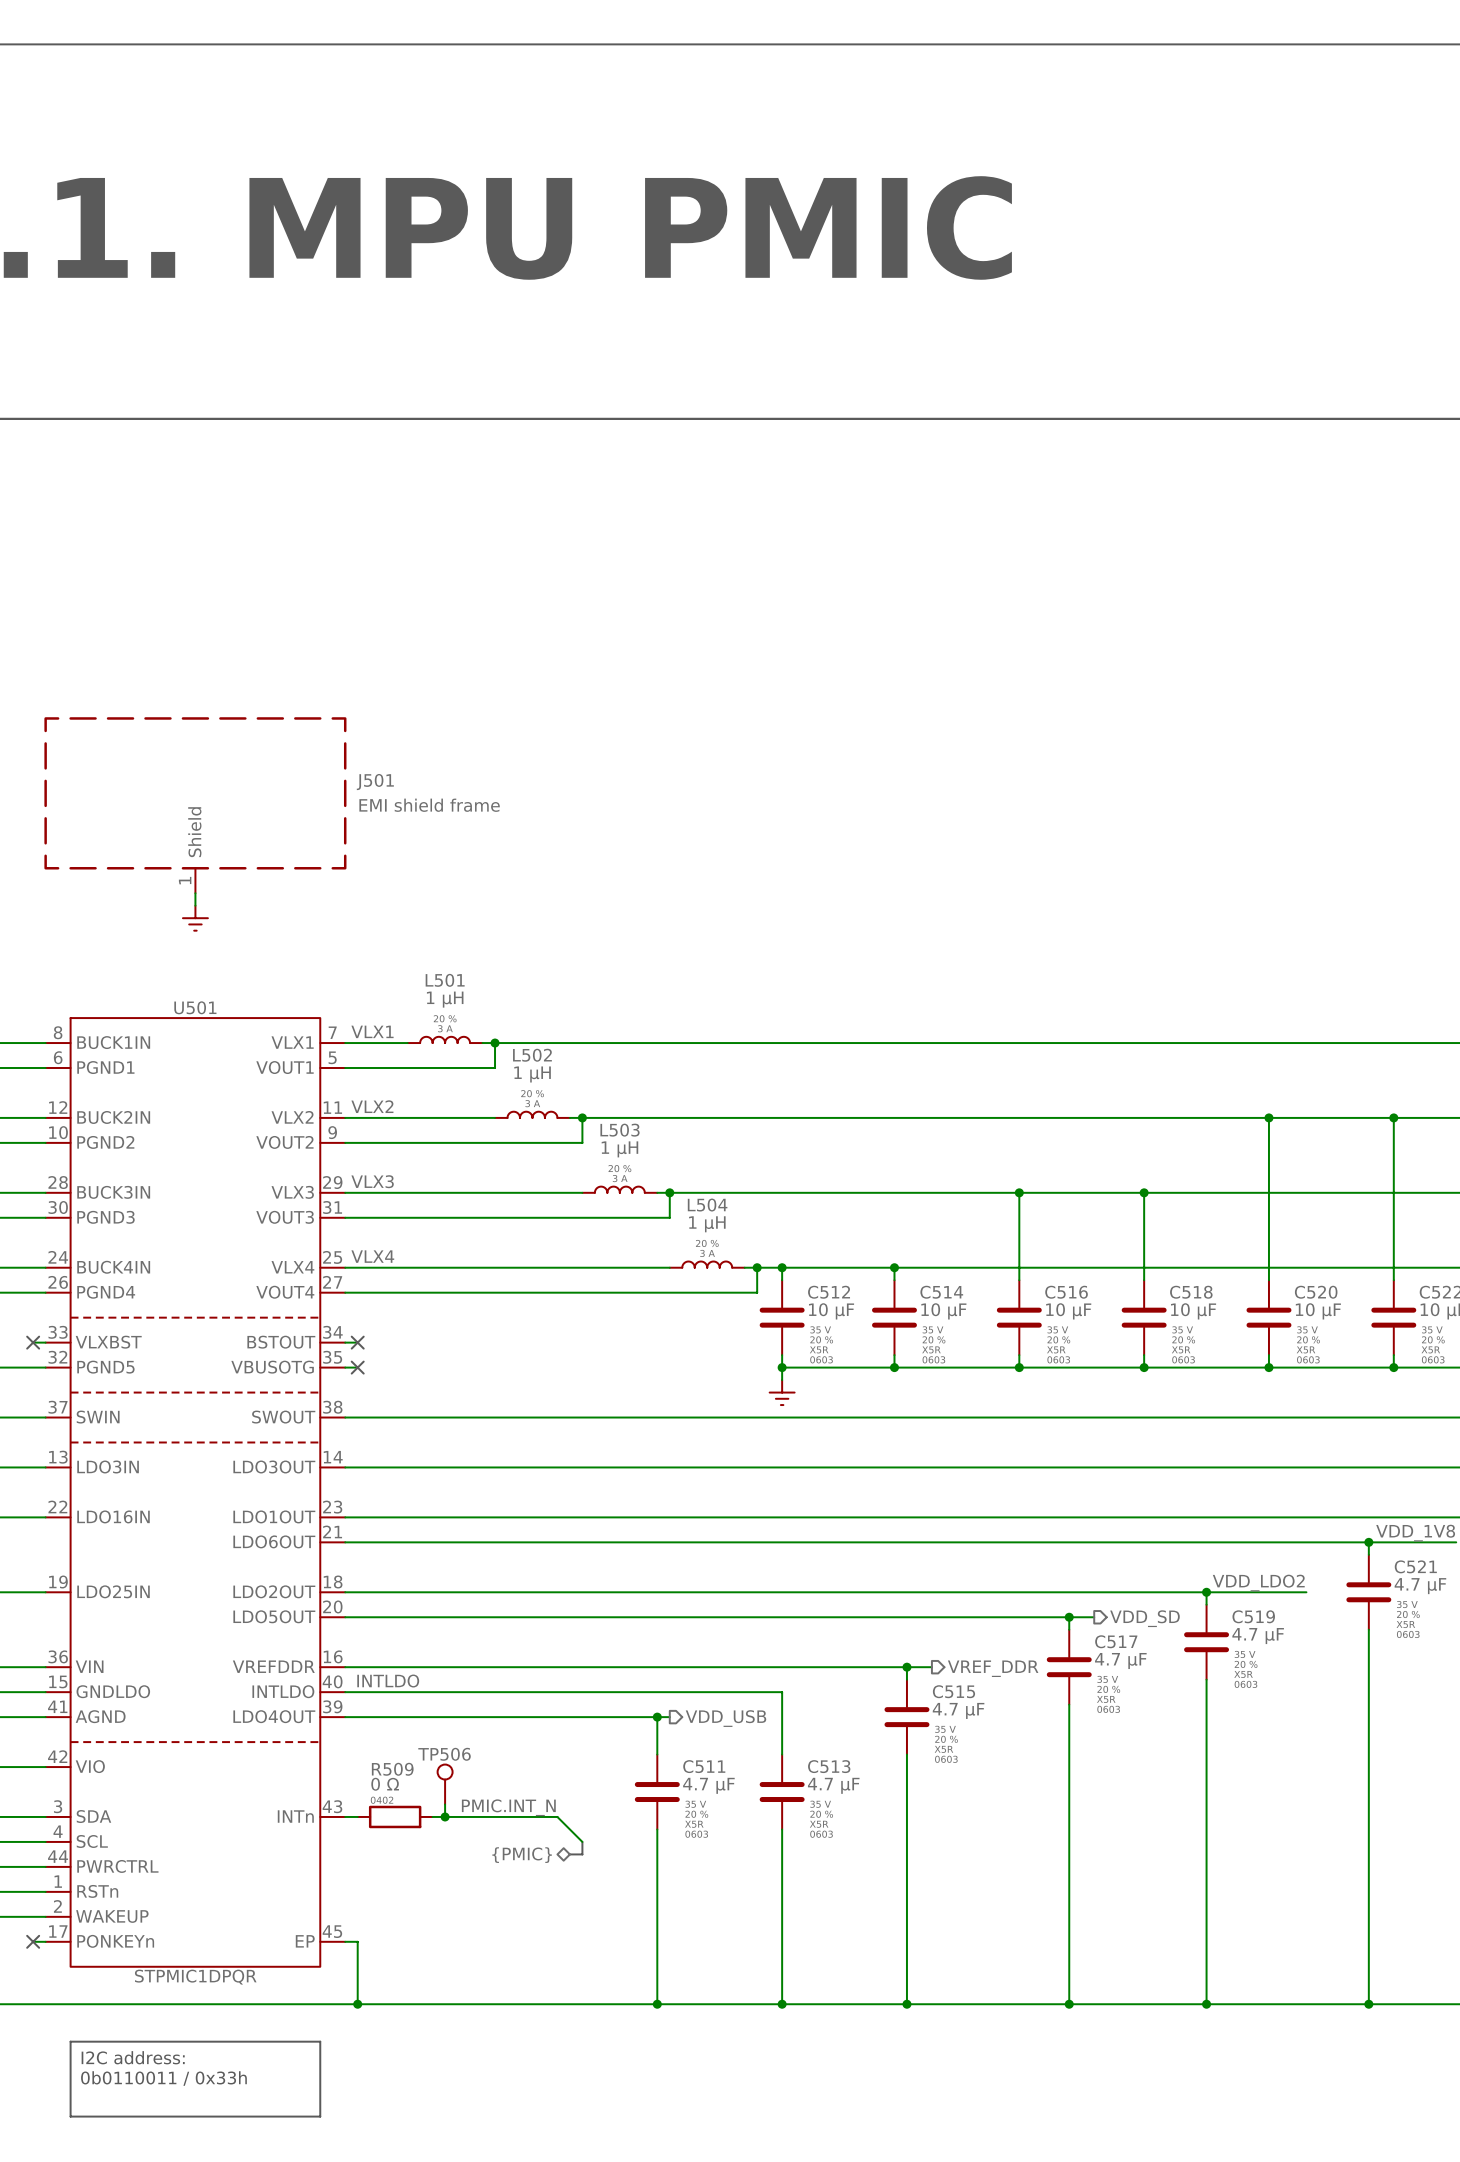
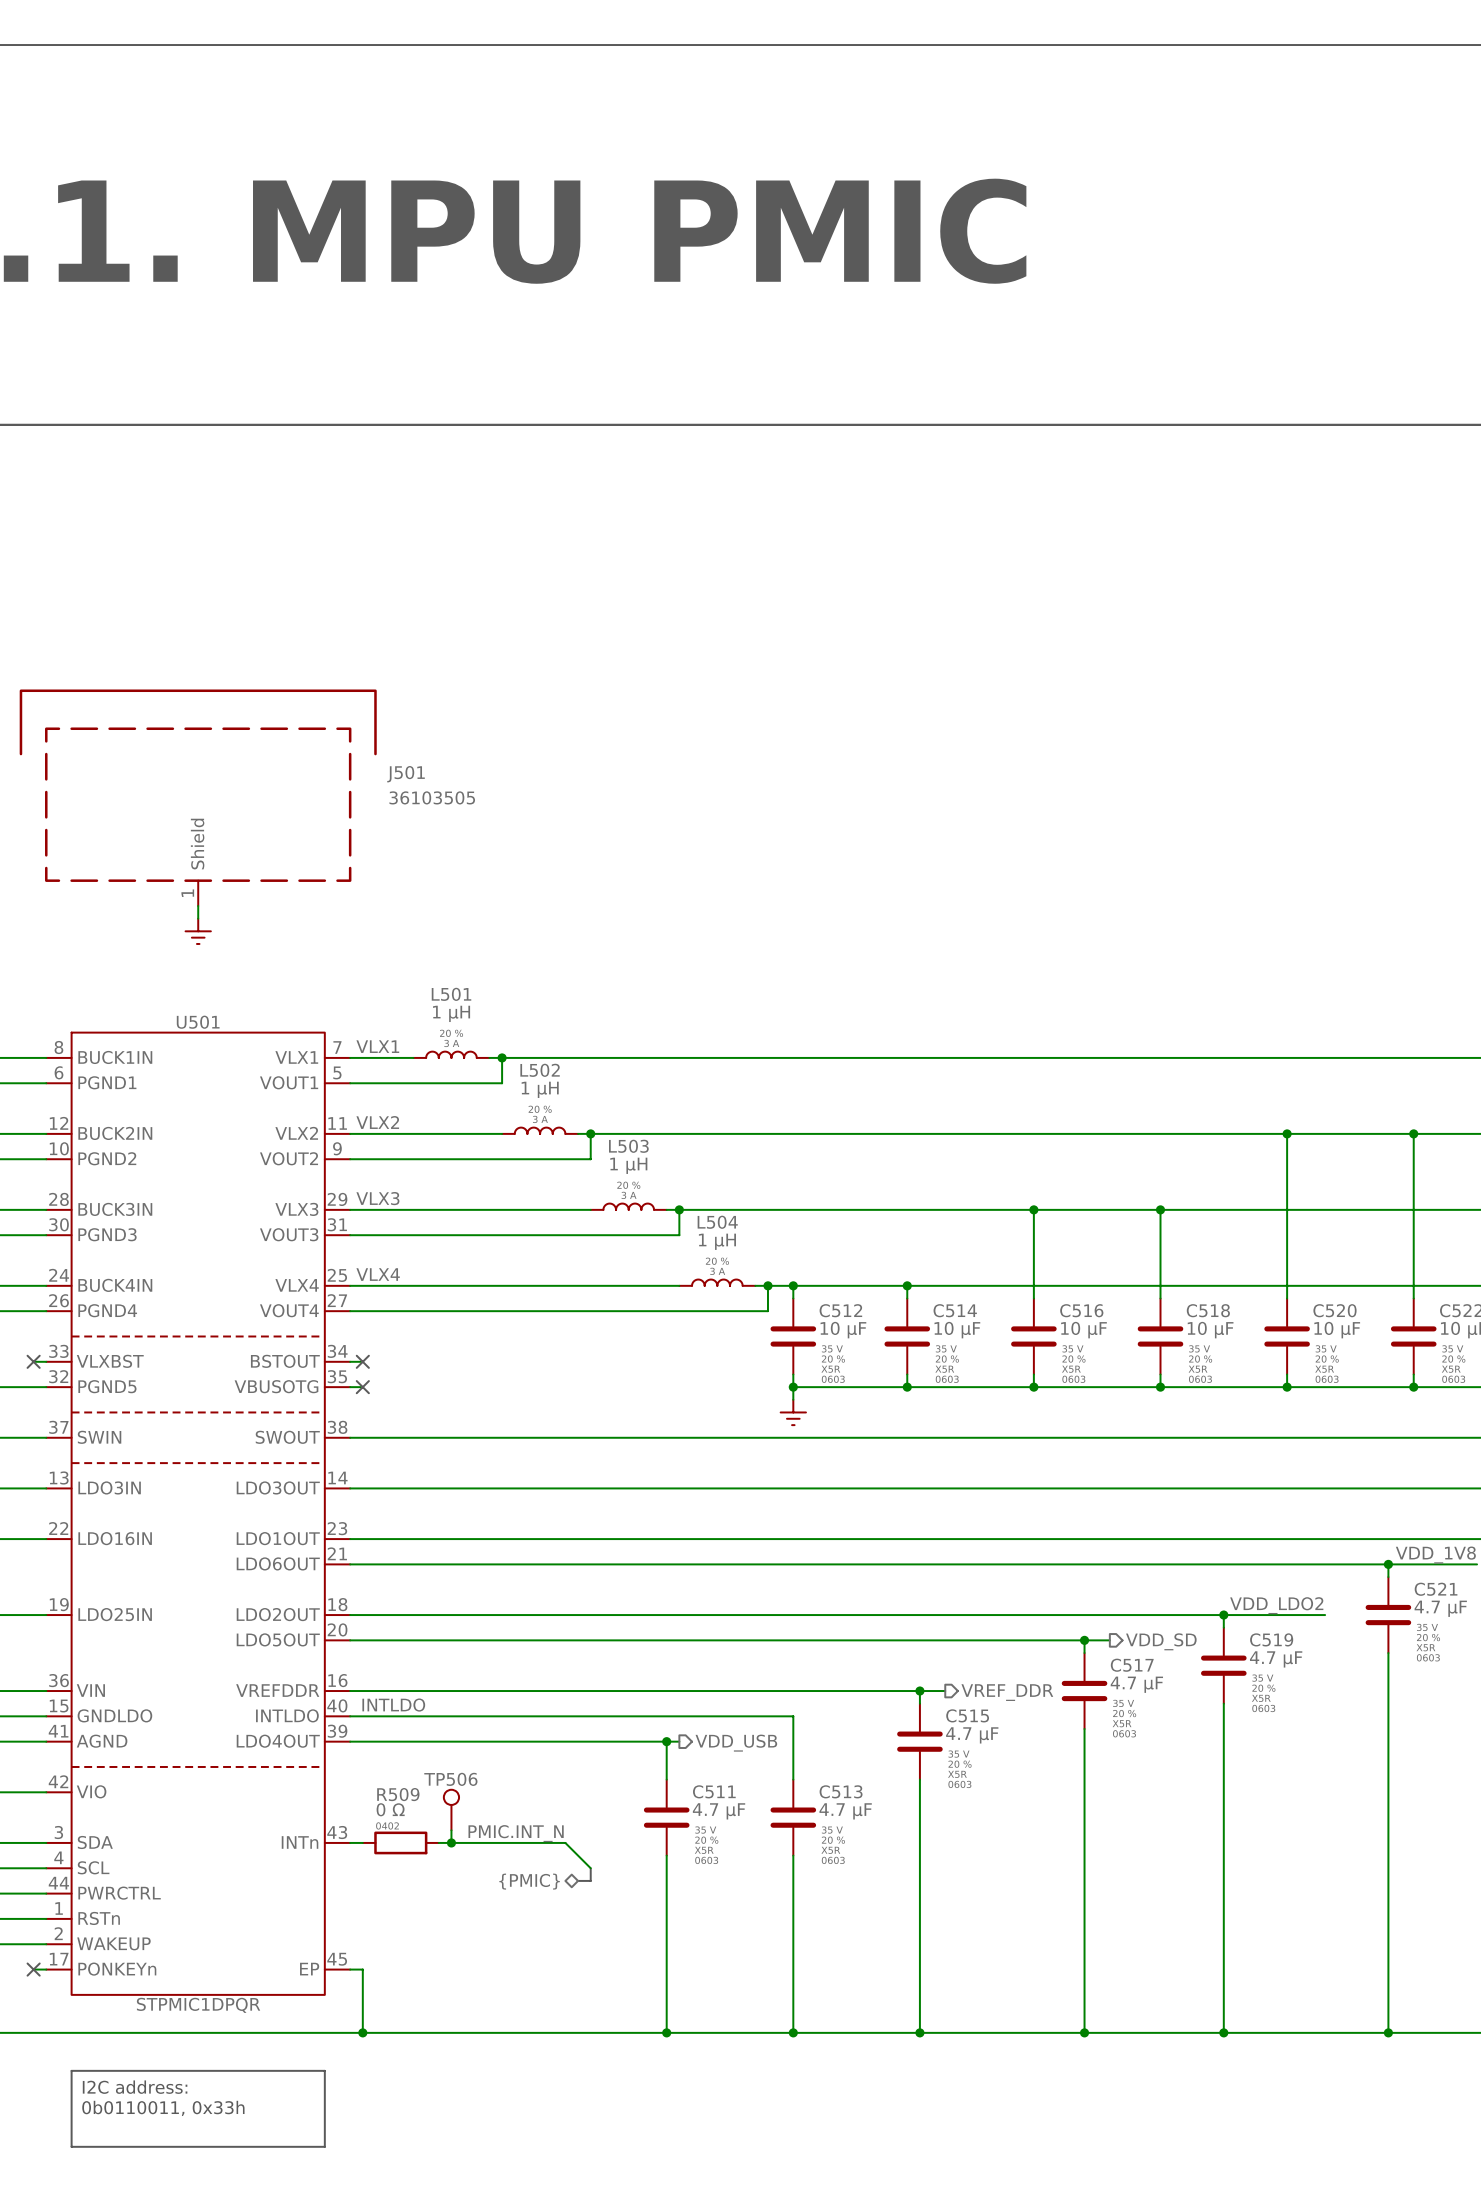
J501 symbol: [44, 717, 347, 894] -> [19, 689, 377, 906]
J501 name position: J501 (375, 782) -> J501 (406, 774)
J501 value: EMI shield frame (429, 805) -> 36103505 (432, 797)
text: 0b0110011 / 0x33h (163, 2078) -> 0b0110011, 0x33h (163, 2108)

